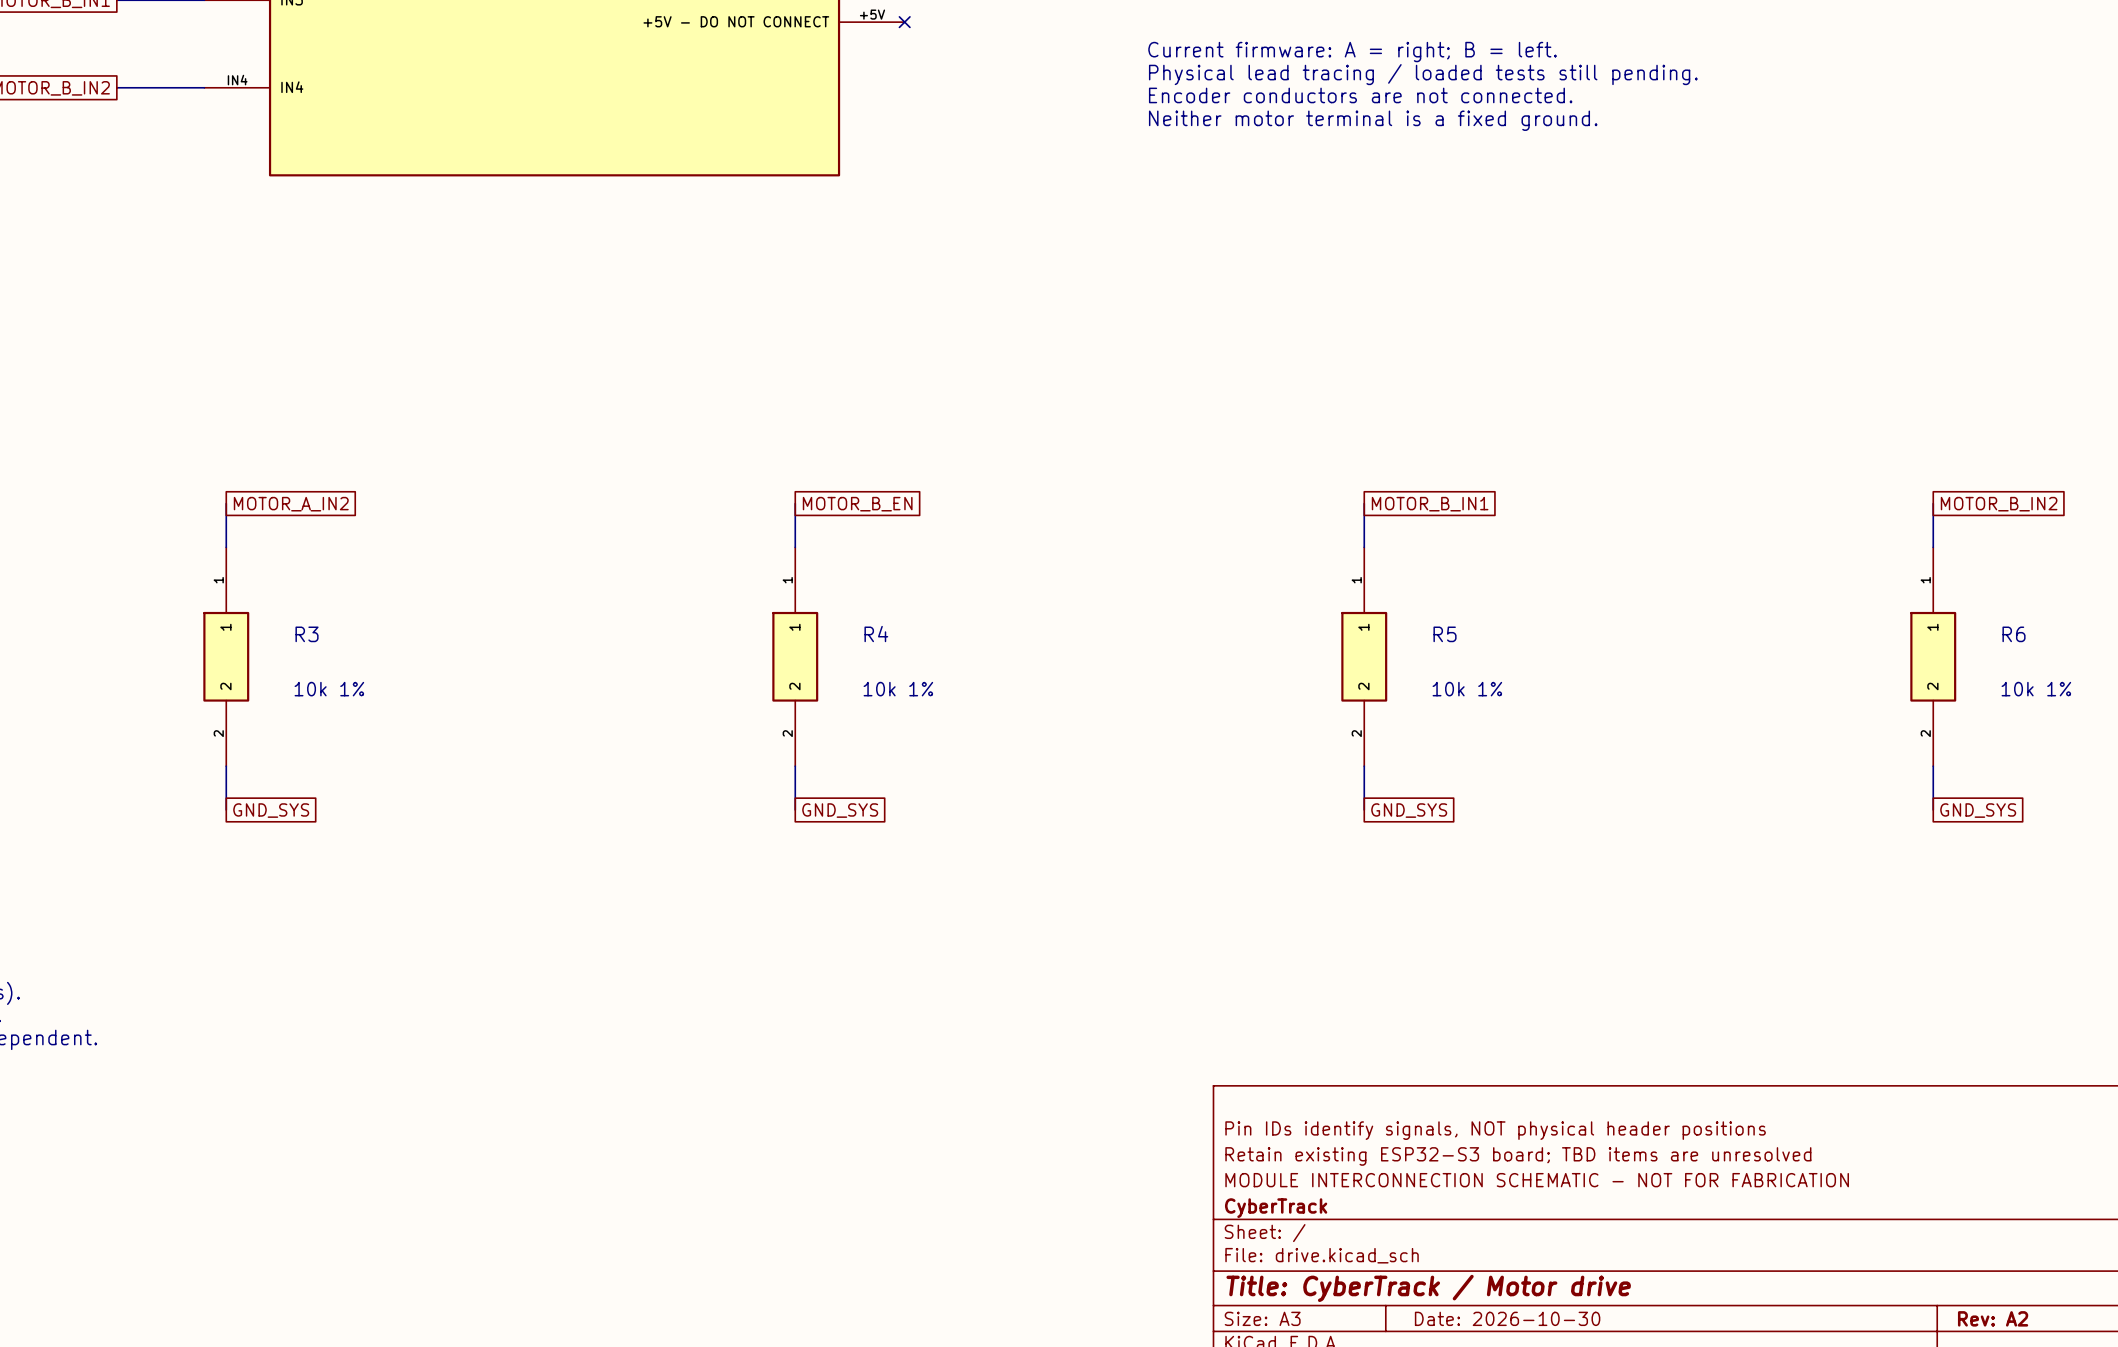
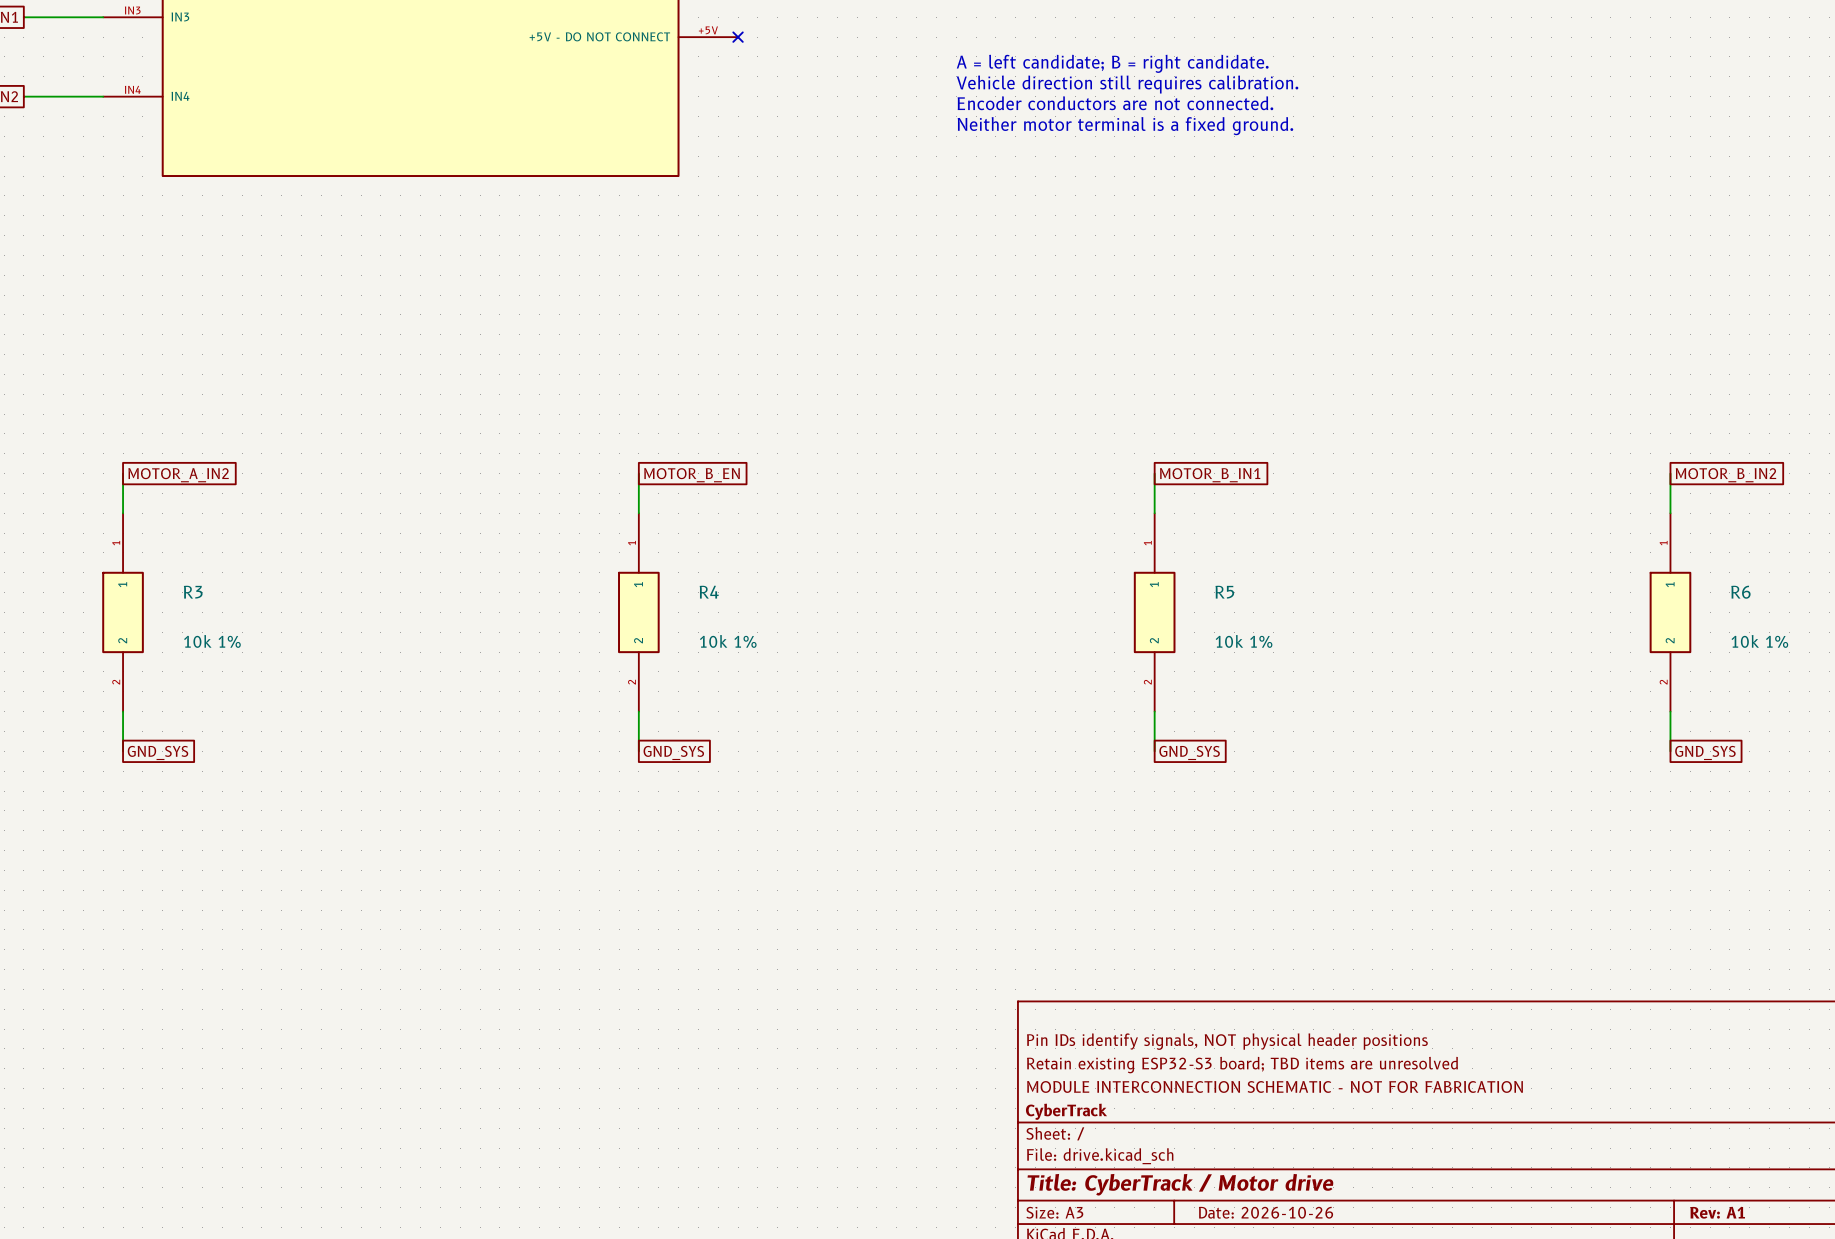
text: Current firmware: A = right; B = left. (1352, 52) -> A = left candidate; B = right candidate. (1112, 63)
text: Physical lead tracing / loaded tests still pending. (1423, 74) -> Vehicle direction still requires calibration. (1127, 84)
title block: Date: 2026-10-30 (1507, 1318) -> Date: 2026-10-26 (1266, 1212)
title block: Rev: A2 (1993, 1318) -> Rev: A1 (1717, 1212)

